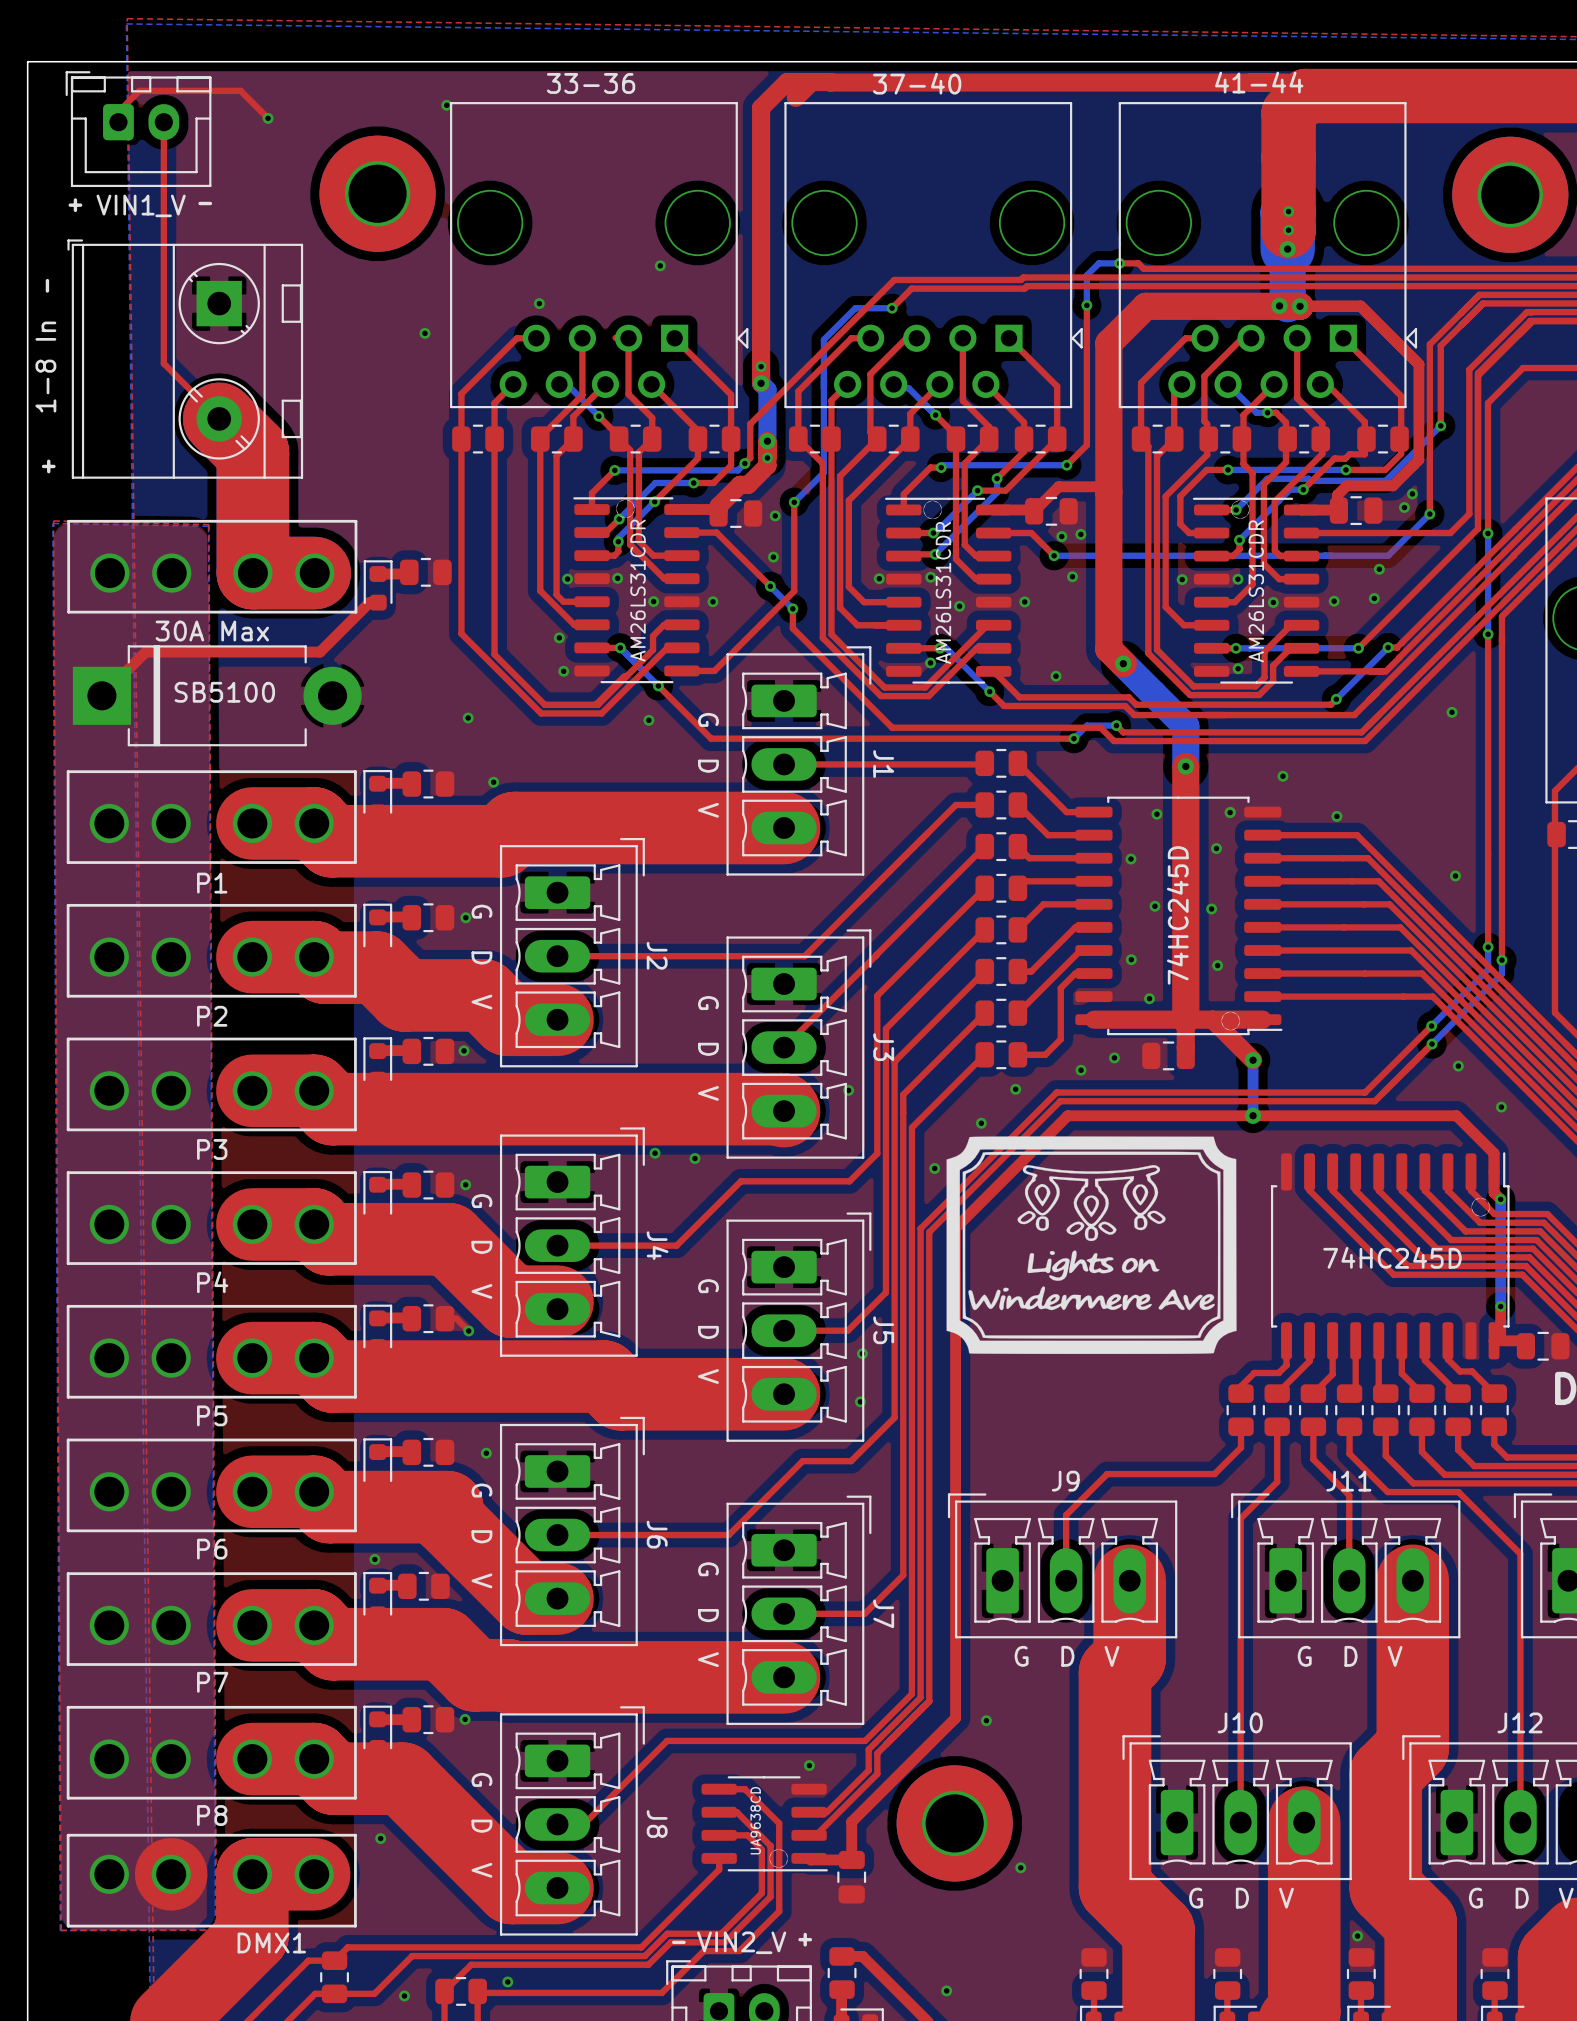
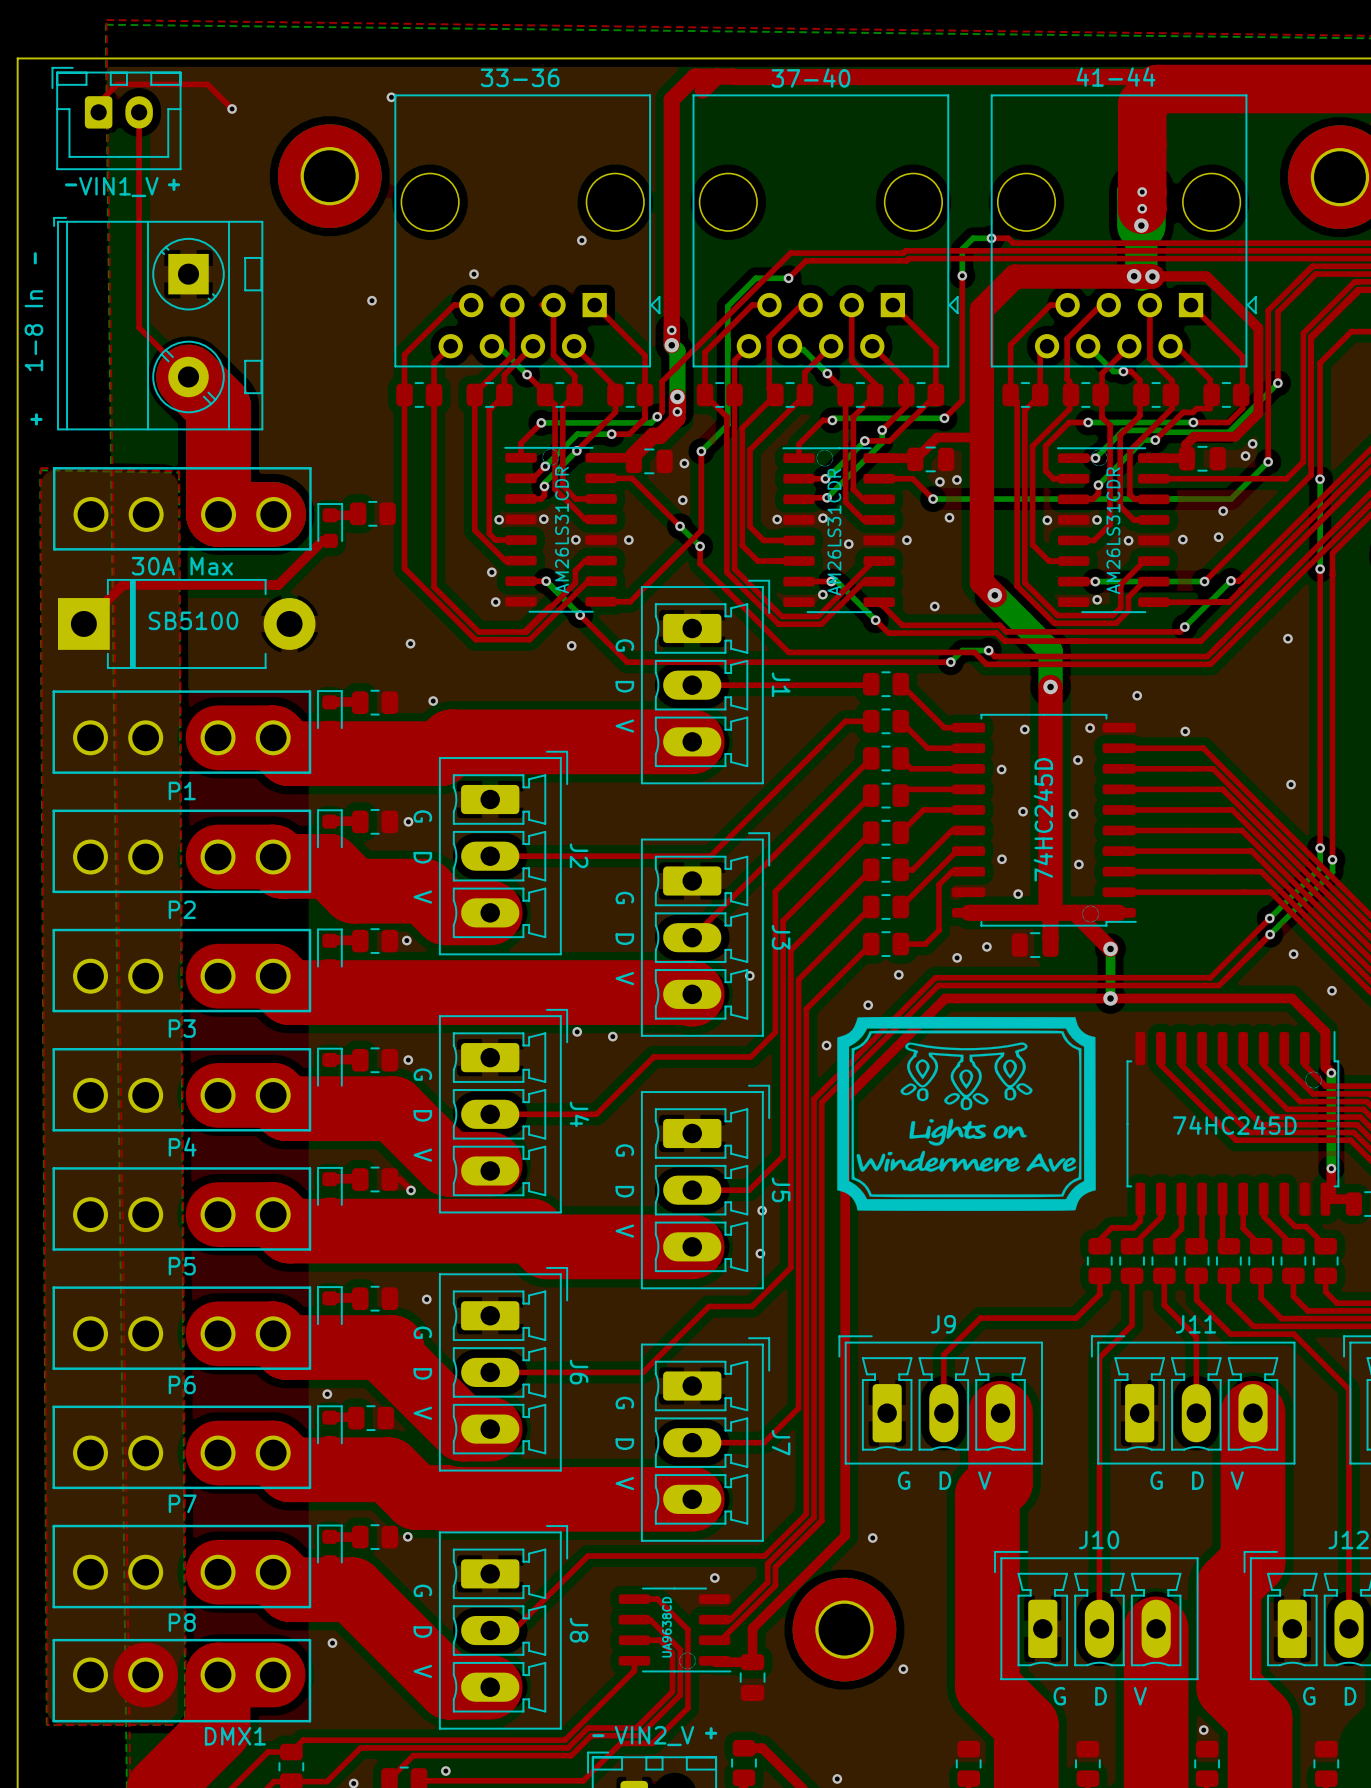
text: - (205, 203) -> + (173, 184)
text: + (75, 205) -> - (71, 184)

